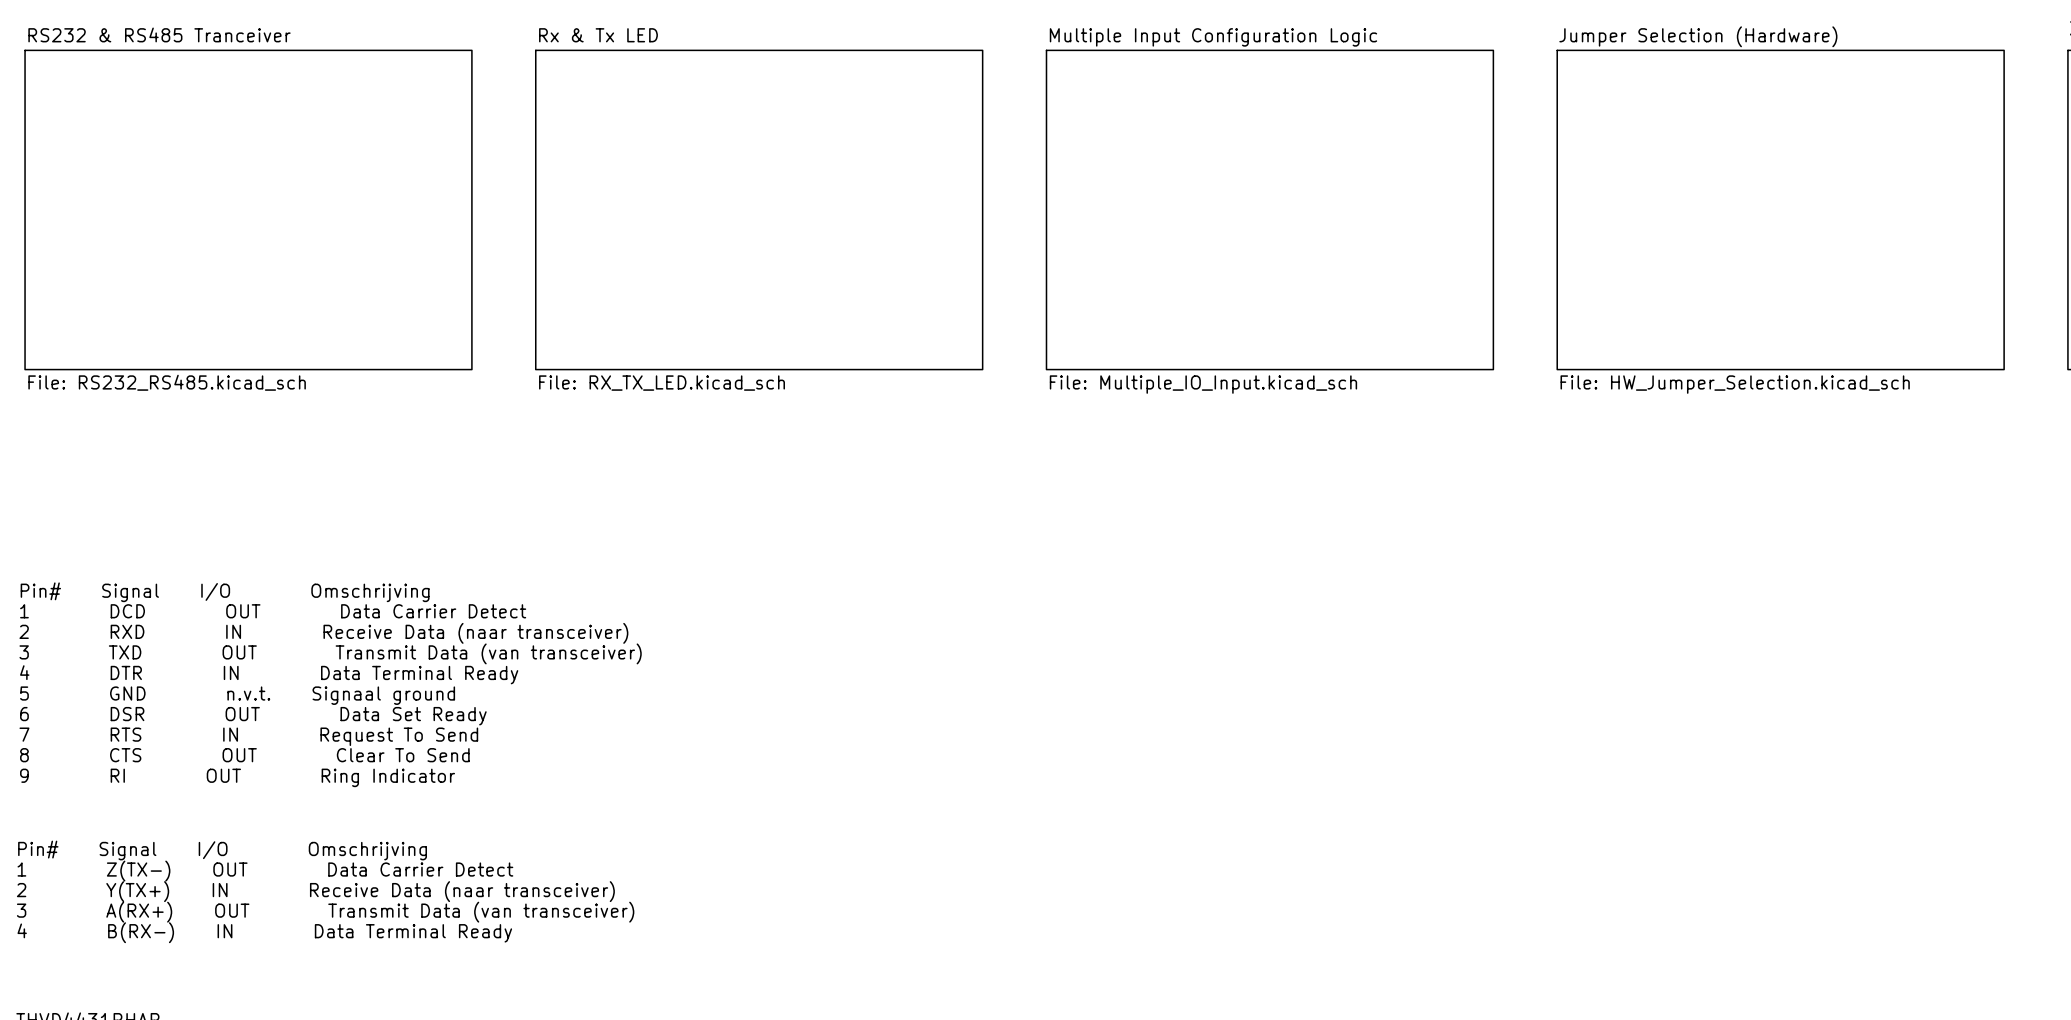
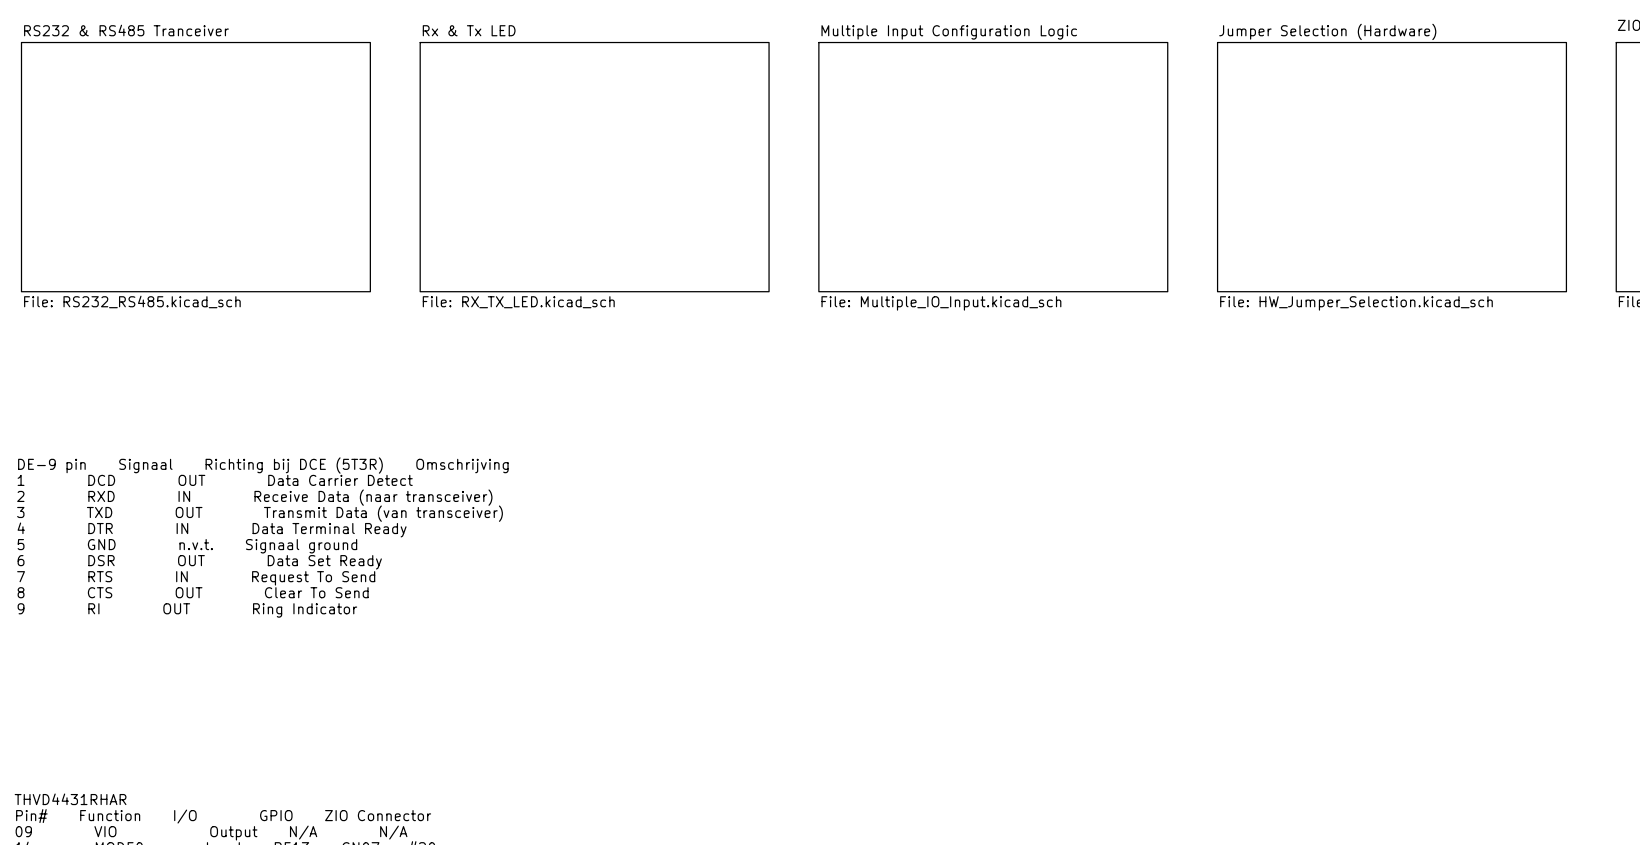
text: Pin# Signal I/O Omschrijving (225, 592) -> DE-9 pin Signaal Richting bij DCE (5T3R) Omschrijving (263, 465)
text: Pin# Signal I/O Omschrijving (222, 850) -> none
text: 1 Z(TX-) OUT Data Carrier Detect (265, 871) -> none
text: 2 Y(TX+) IN Receive Data (naar transceiver) (315, 891) -> none
text: 3 A(RX+) OUT Transmit Data (van transceiver) (325, 912) -> none
text: 4 B(RX-) IN Data Terminal Ready (264, 932) -> none

